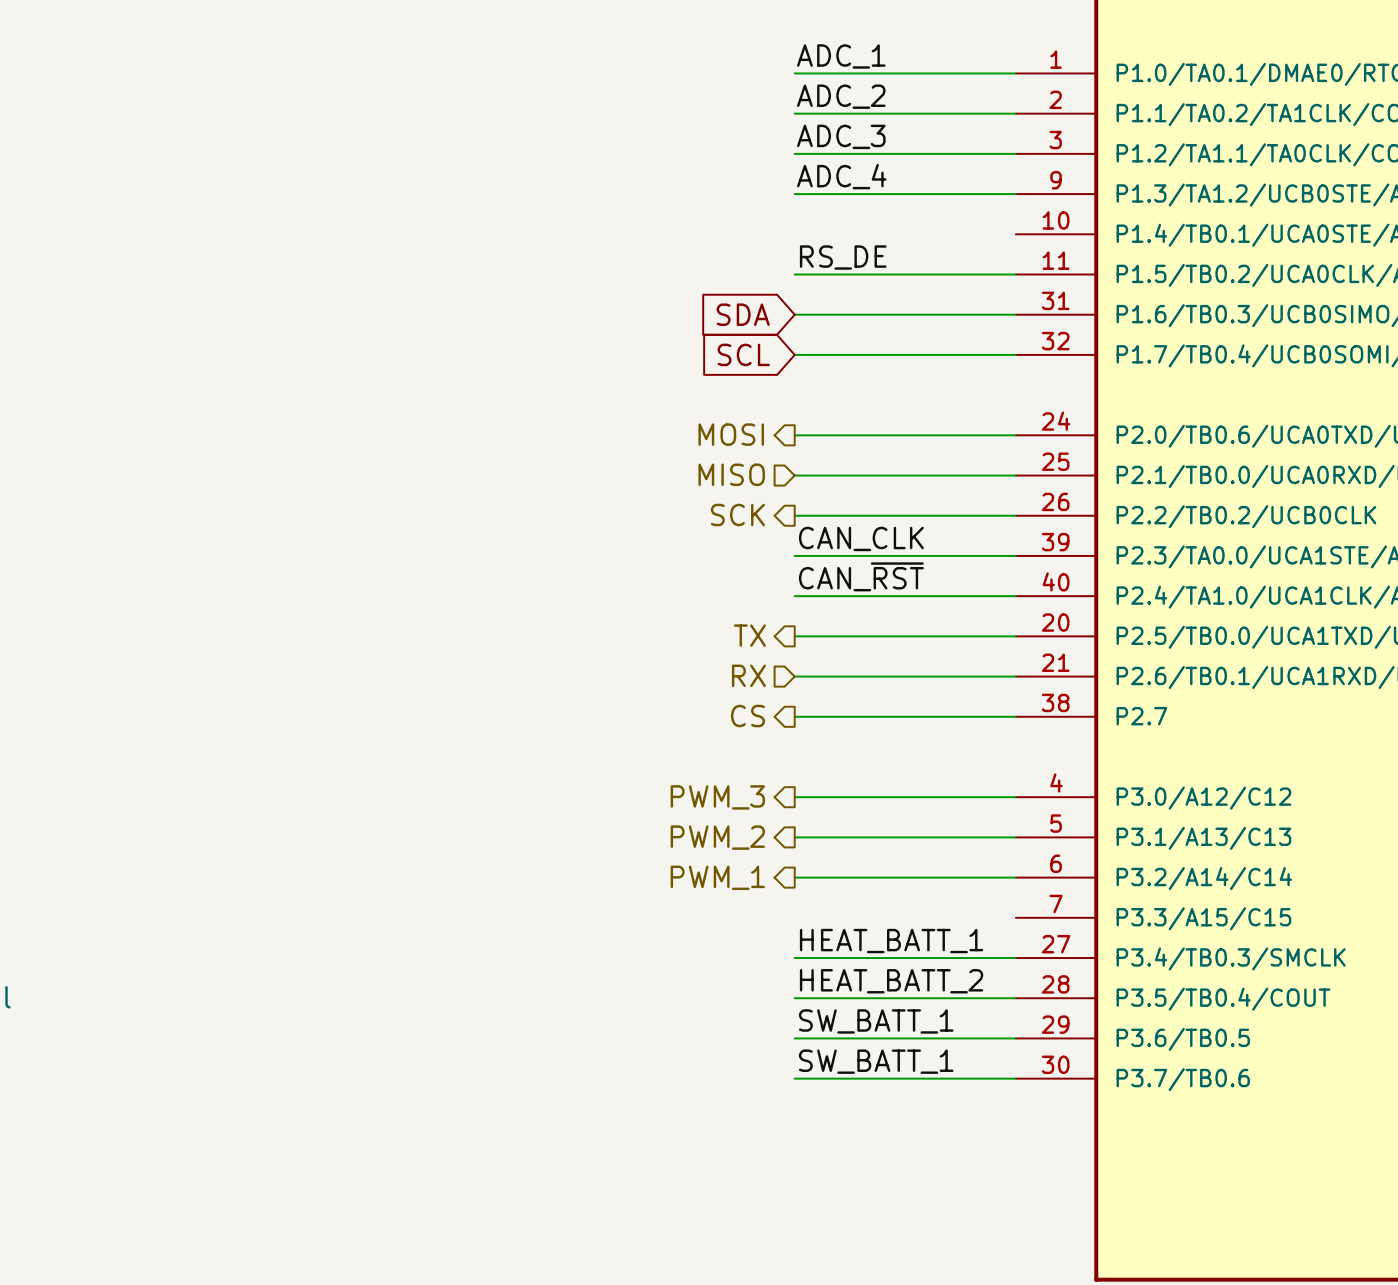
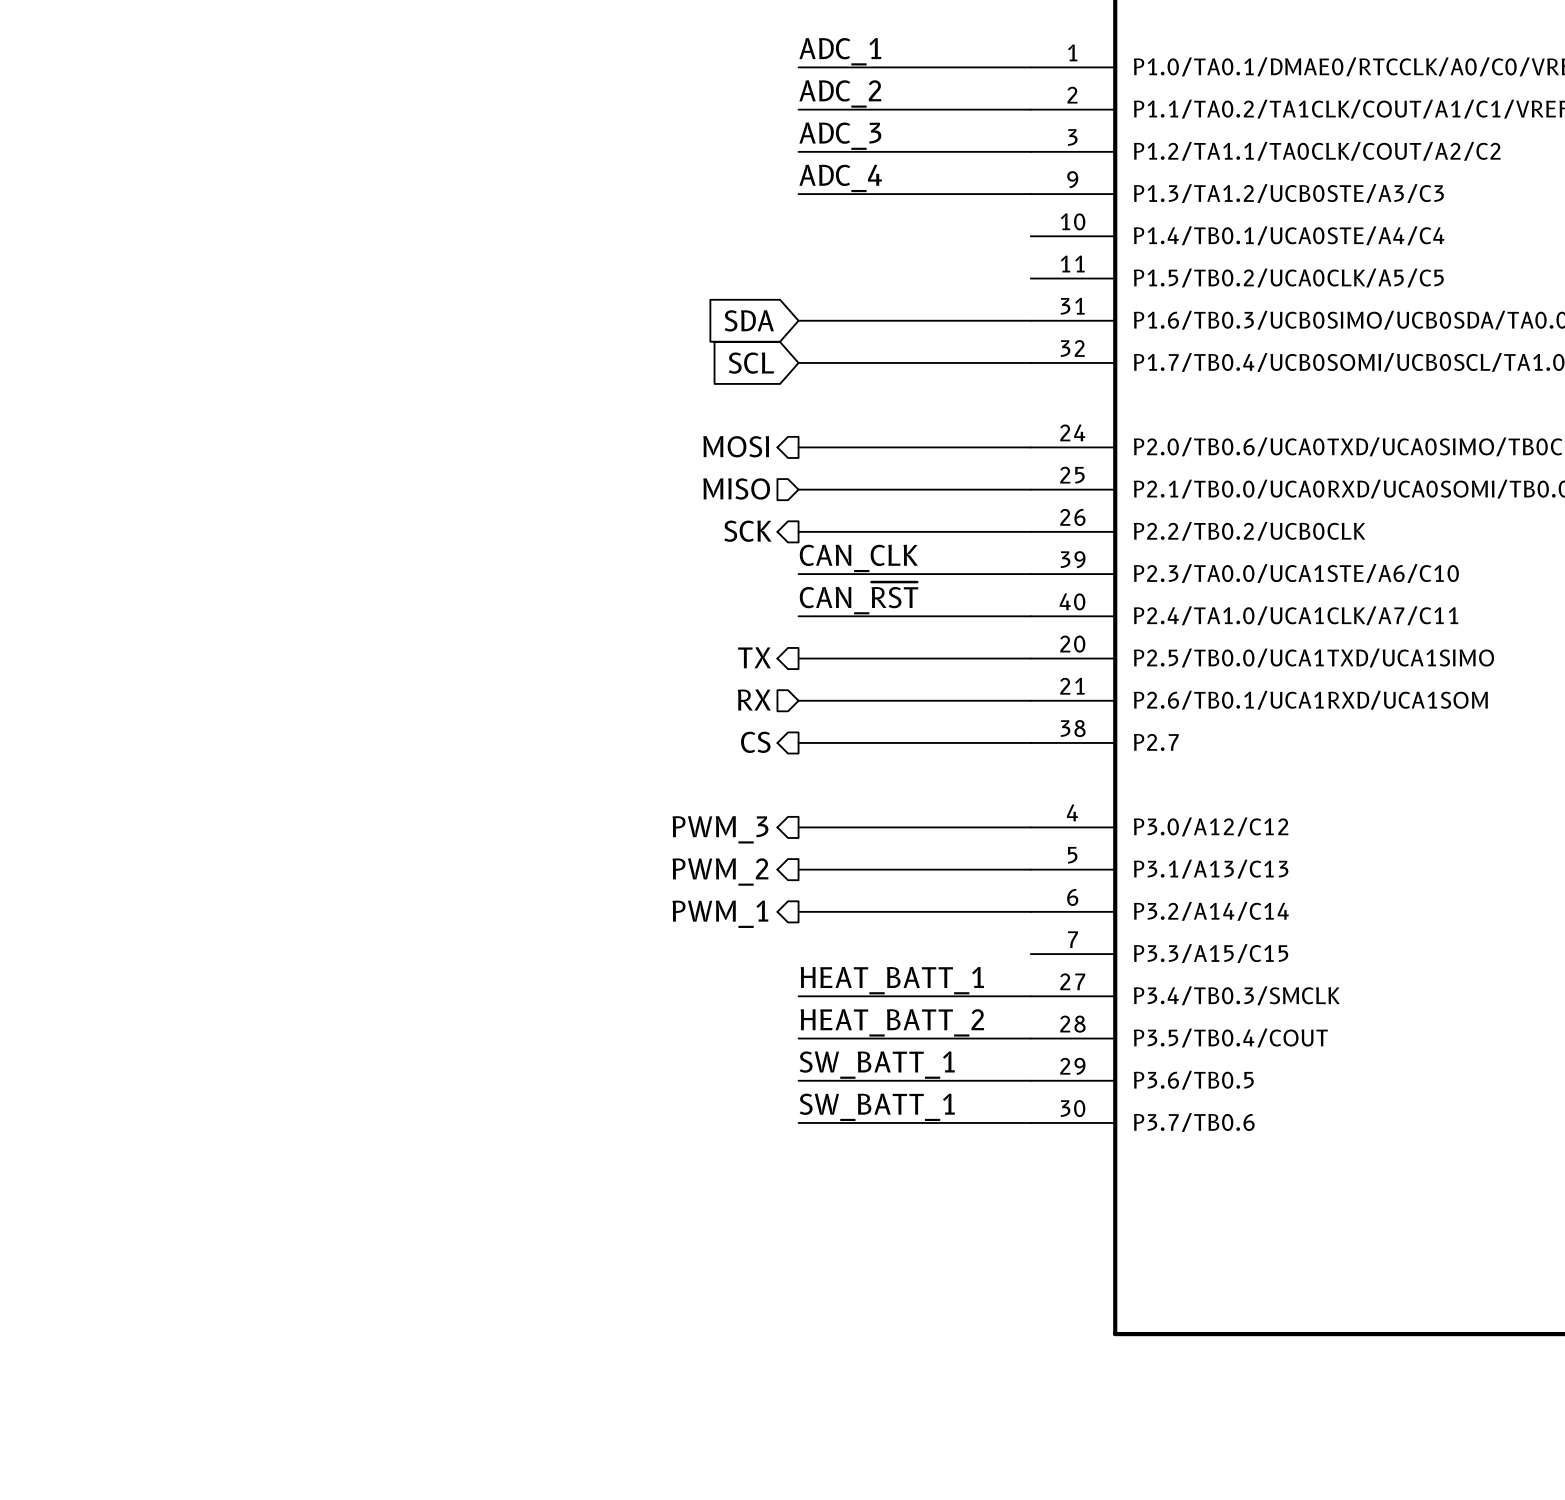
label: RS_DE (843, 257) -> none
wire: (794, 274) (1015, 274) -> none

